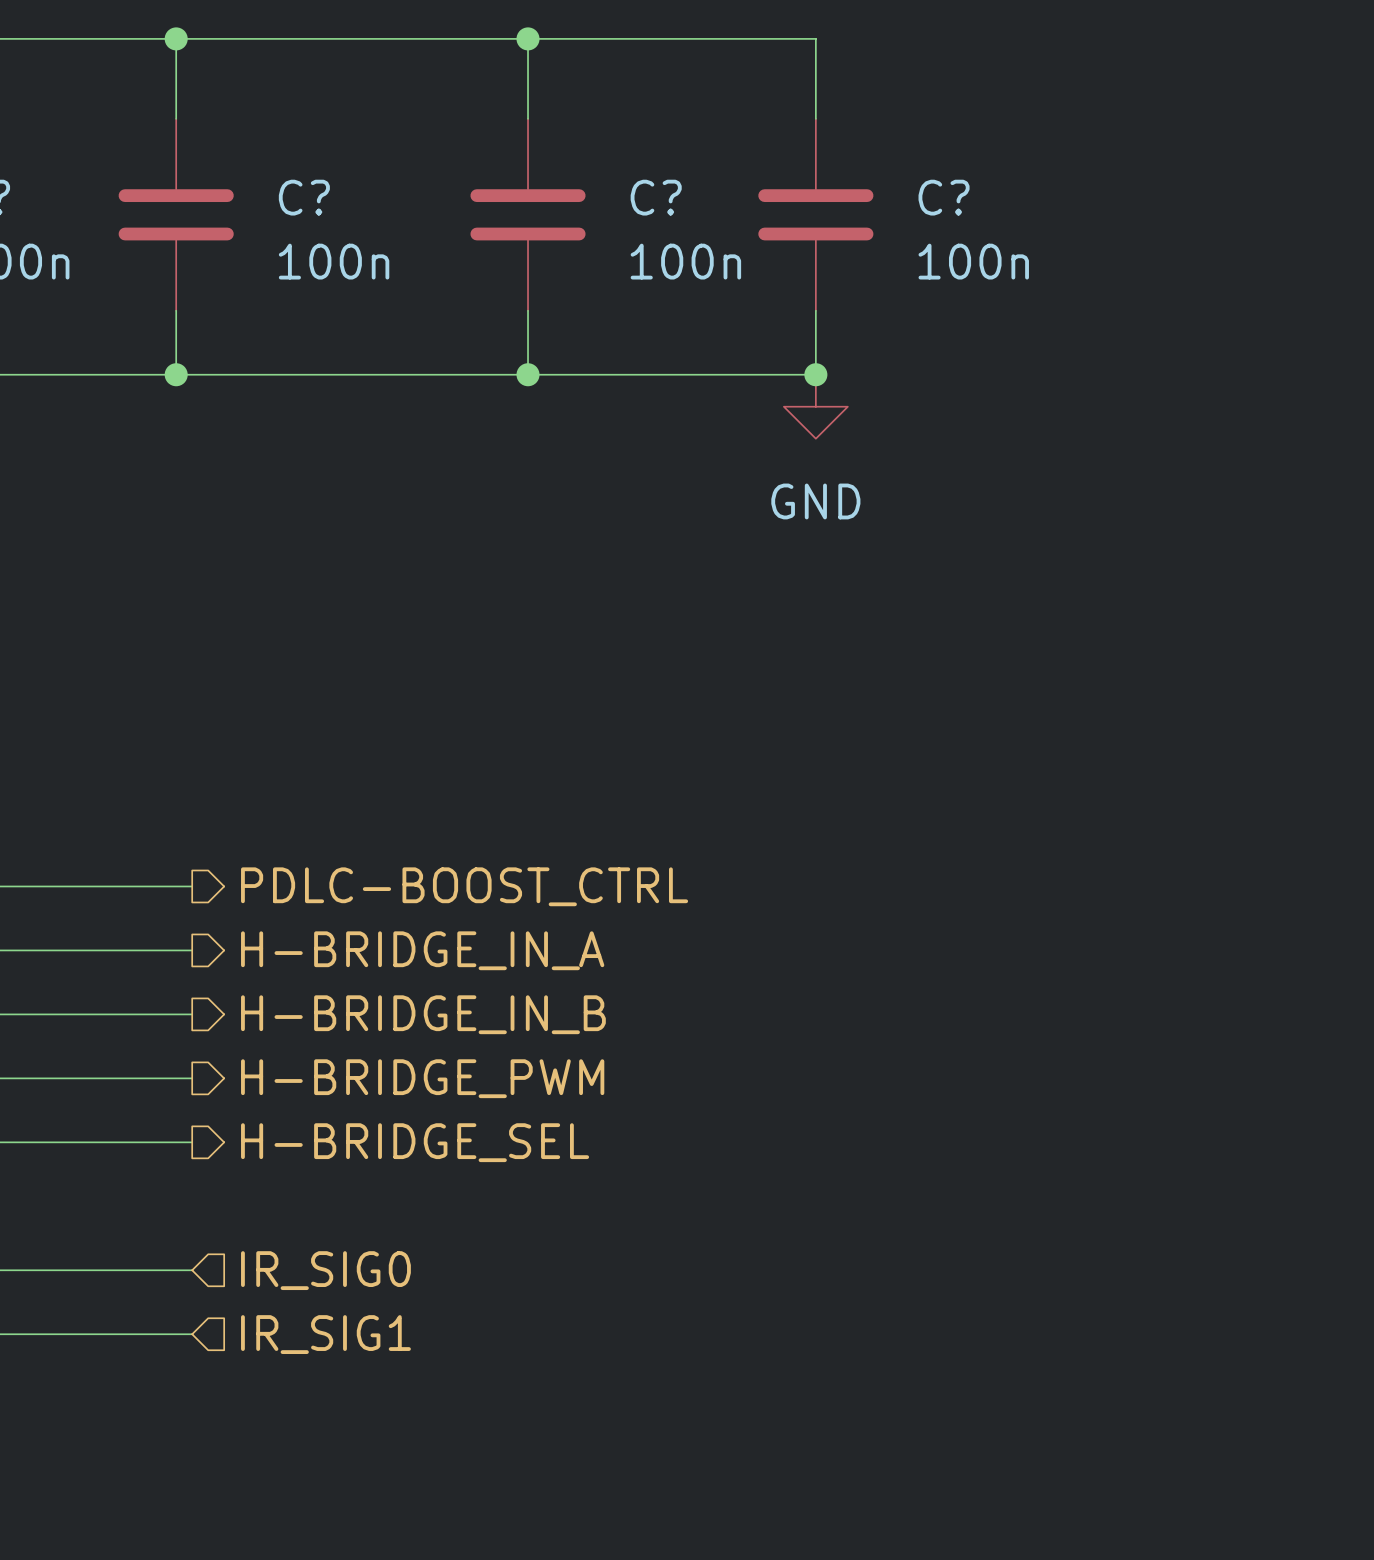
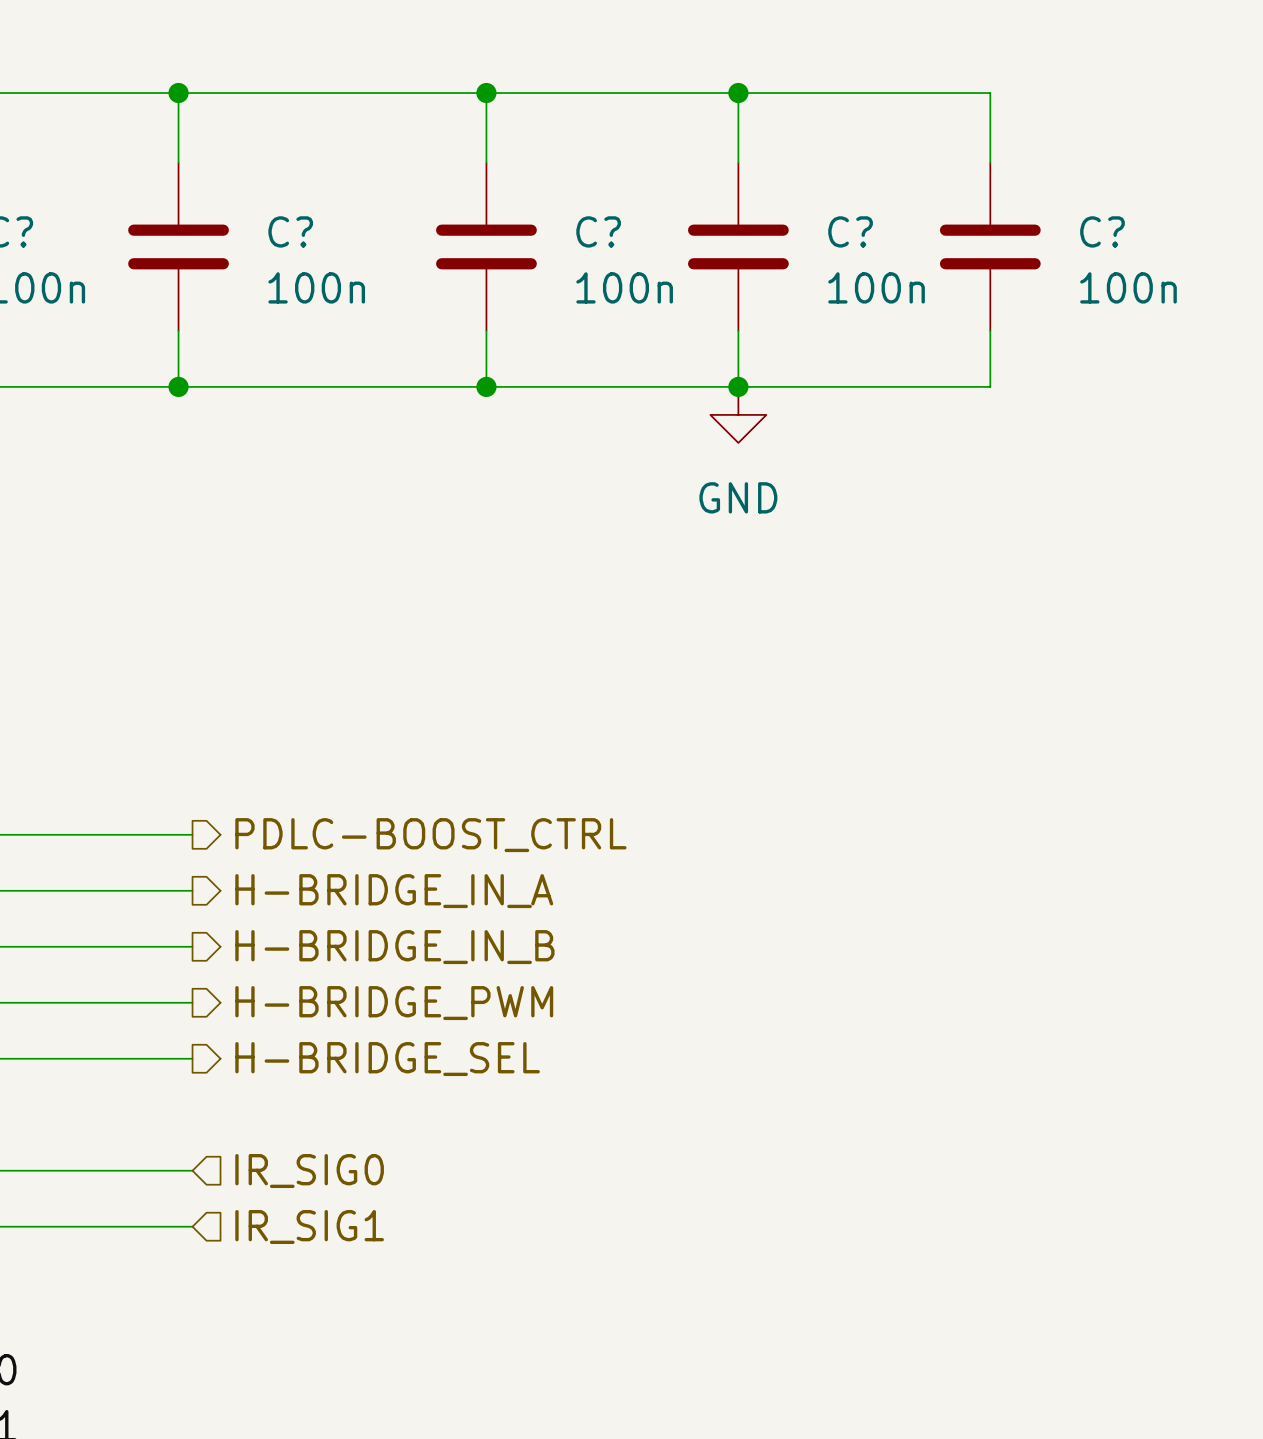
wire: none -> (738, 93) (990, 93) (990, 162)
junction: none -> (738, 93)
C?: none -> 100n (990, 246)
wire: none -> (990, 330) (990, 386) (738, 386)

